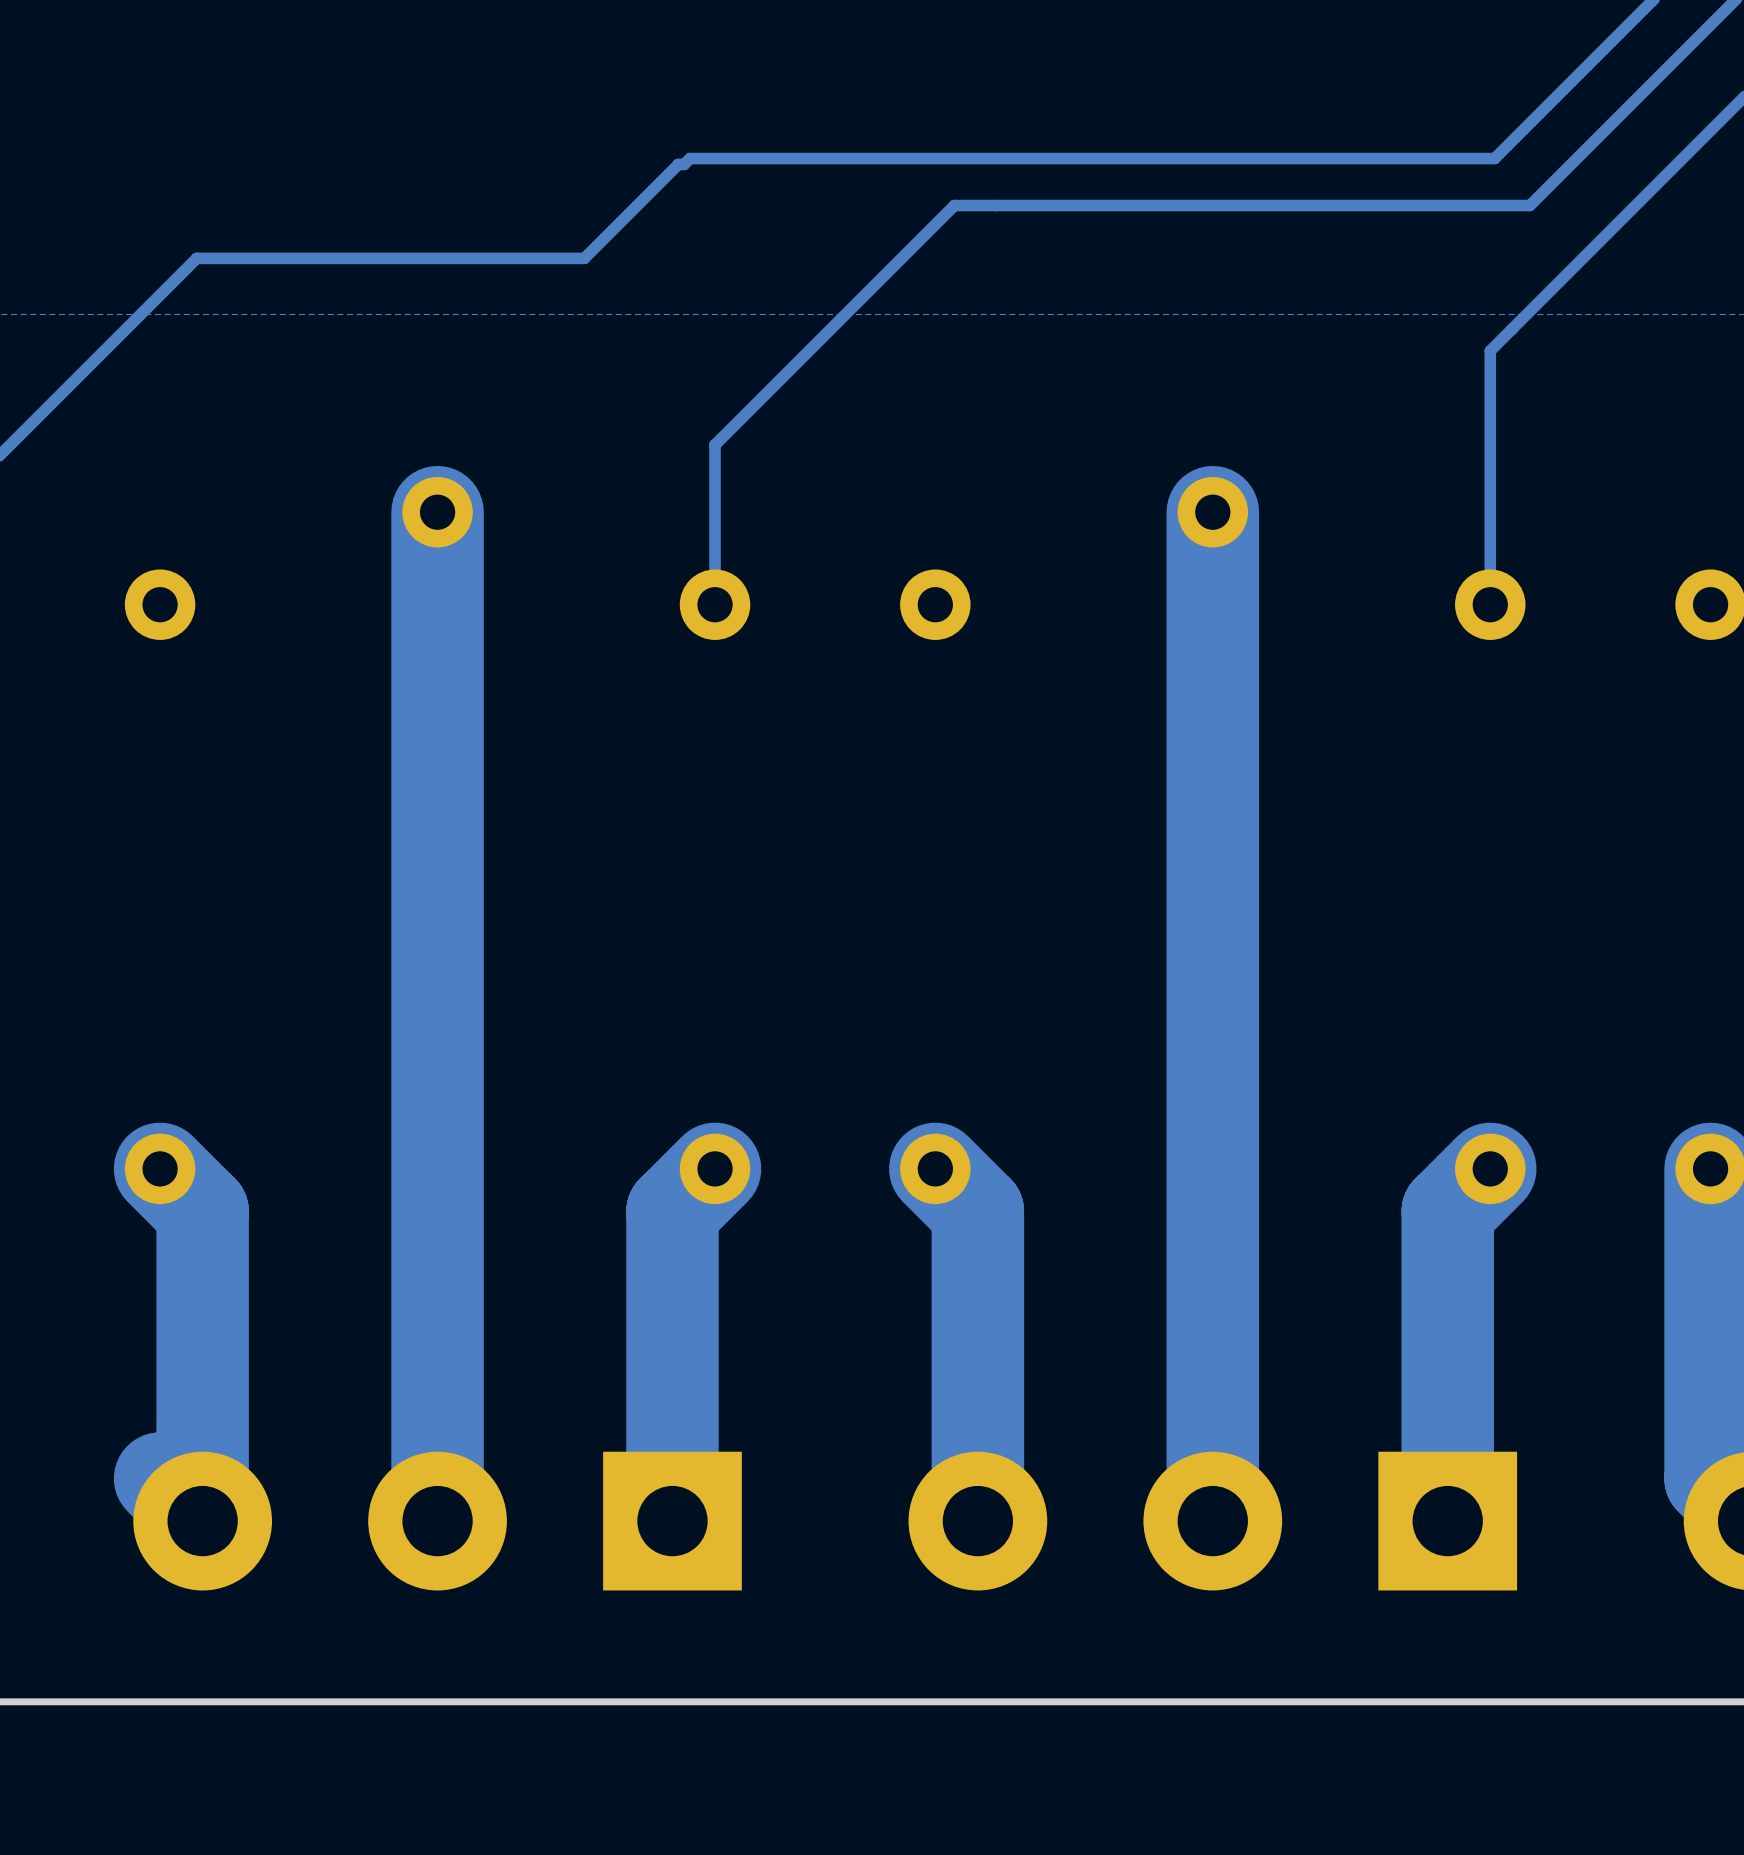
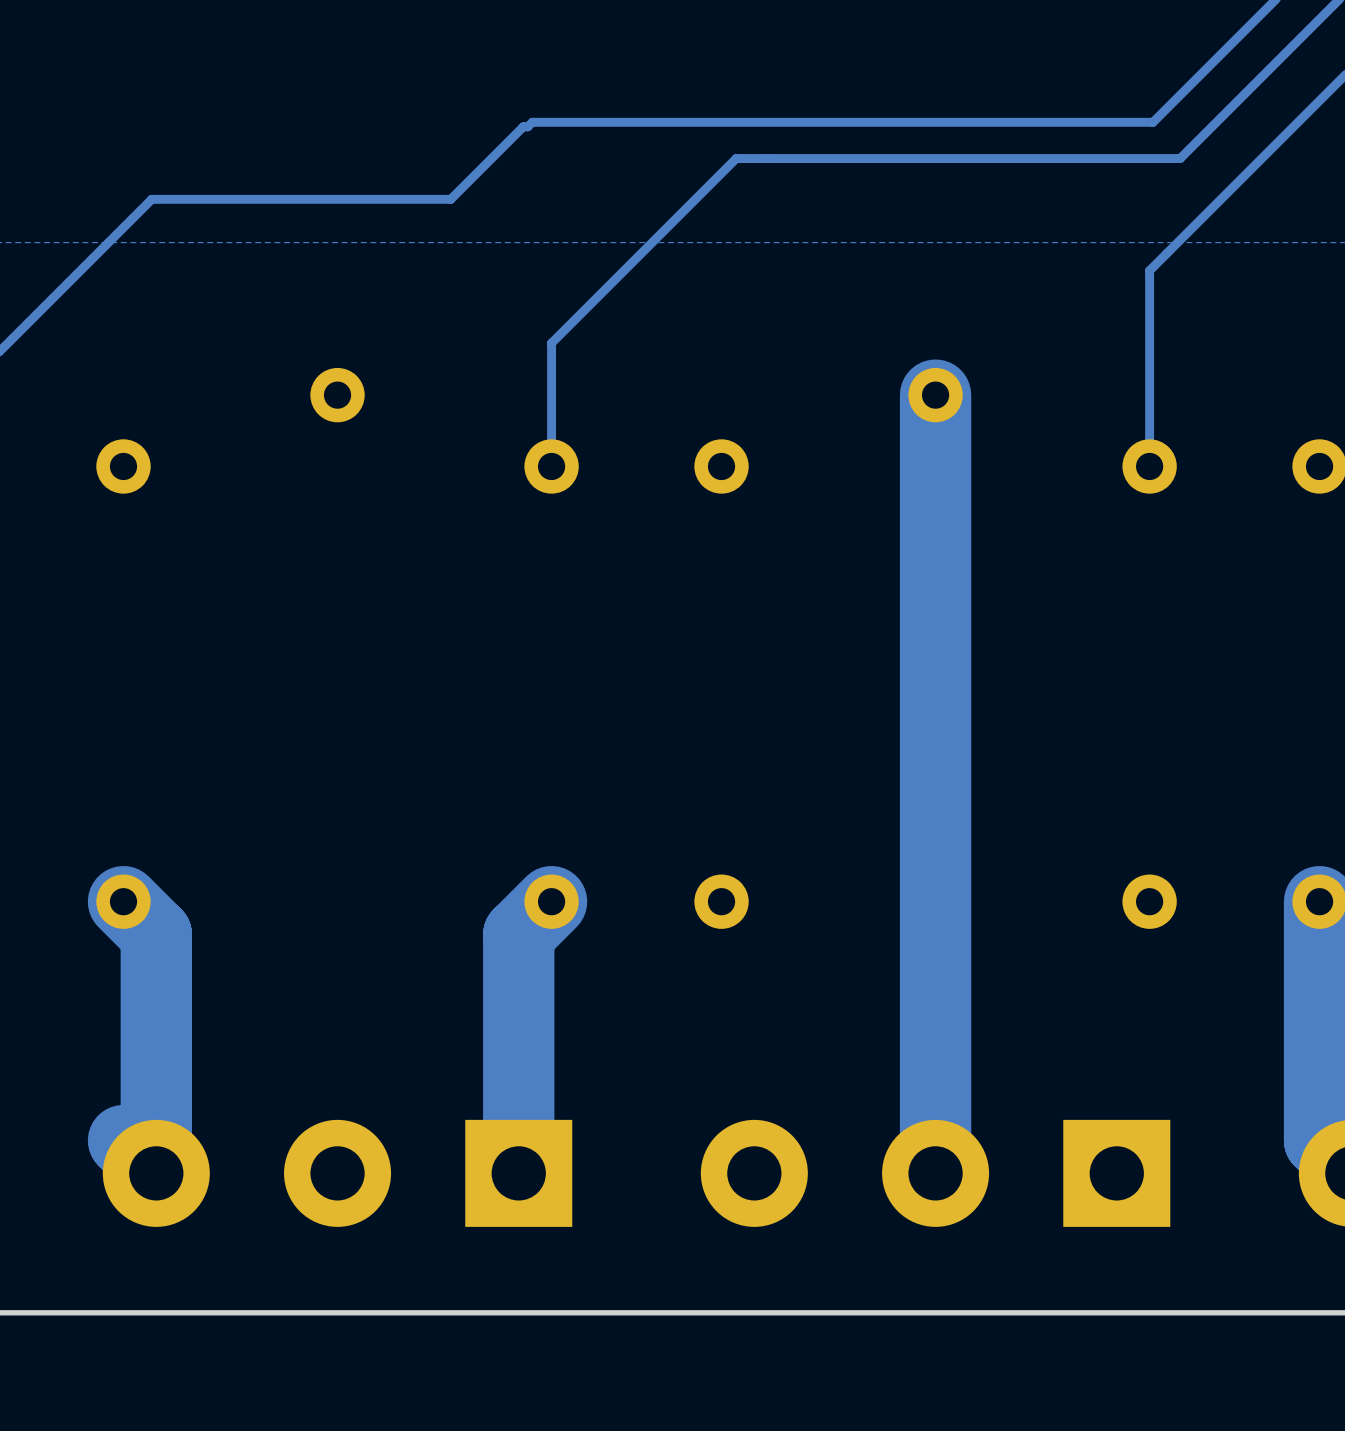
track: (437, 512) (437, 1521) -> none
track: (935, 1168) (977, 1211) (977, 1521) -> none
track: (1490, 1168) (1447, 1211) (1447, 1521) -> none

